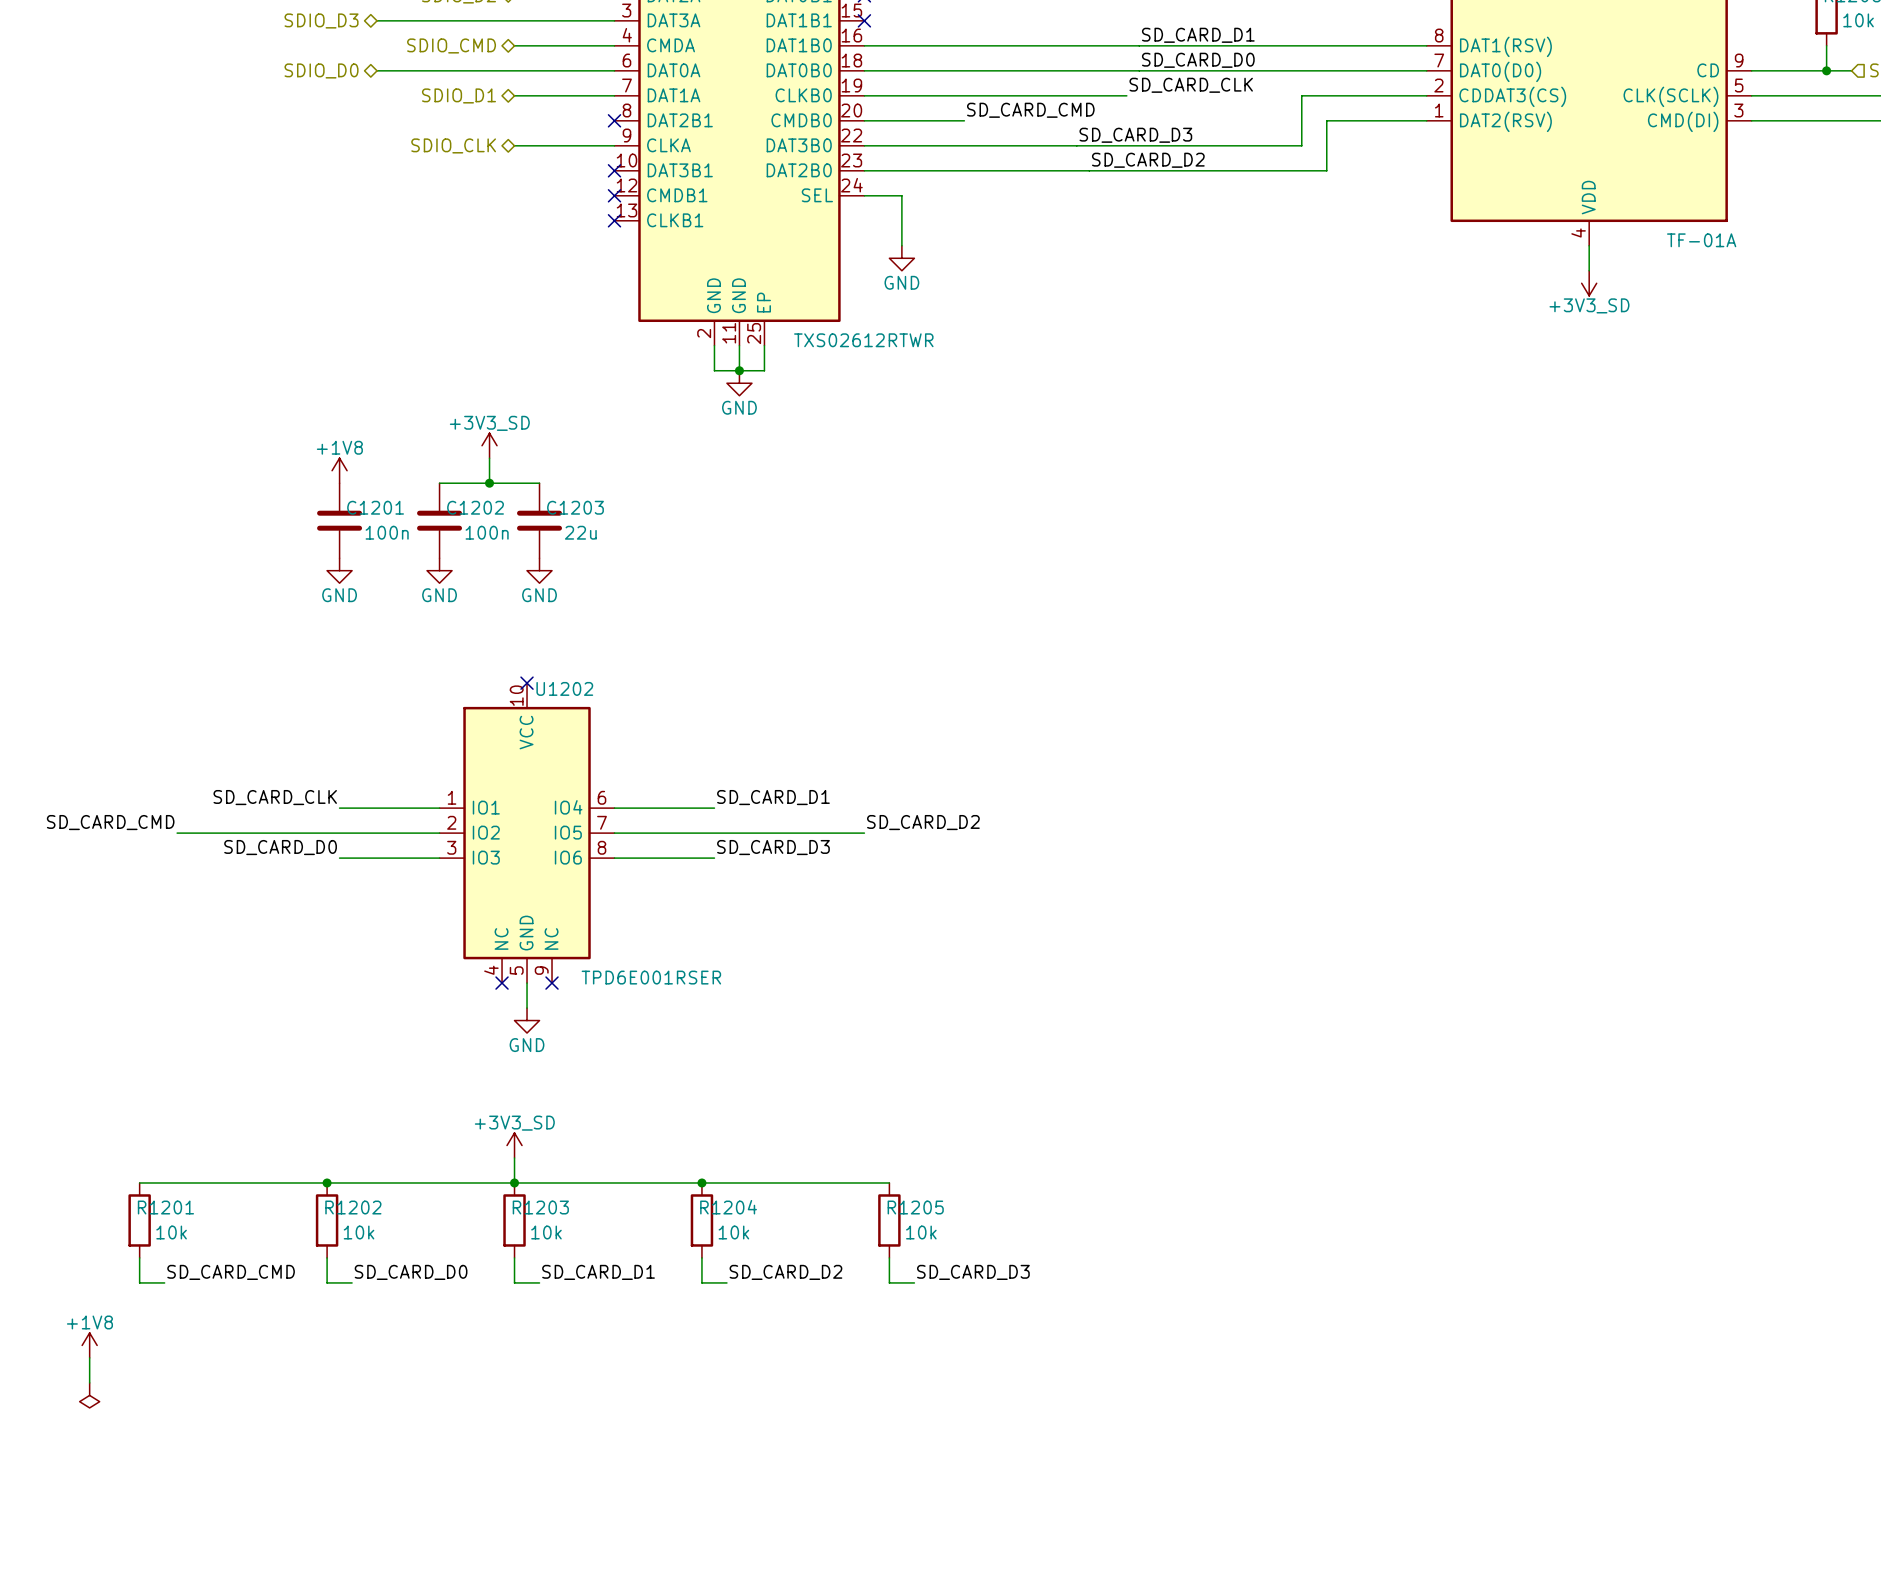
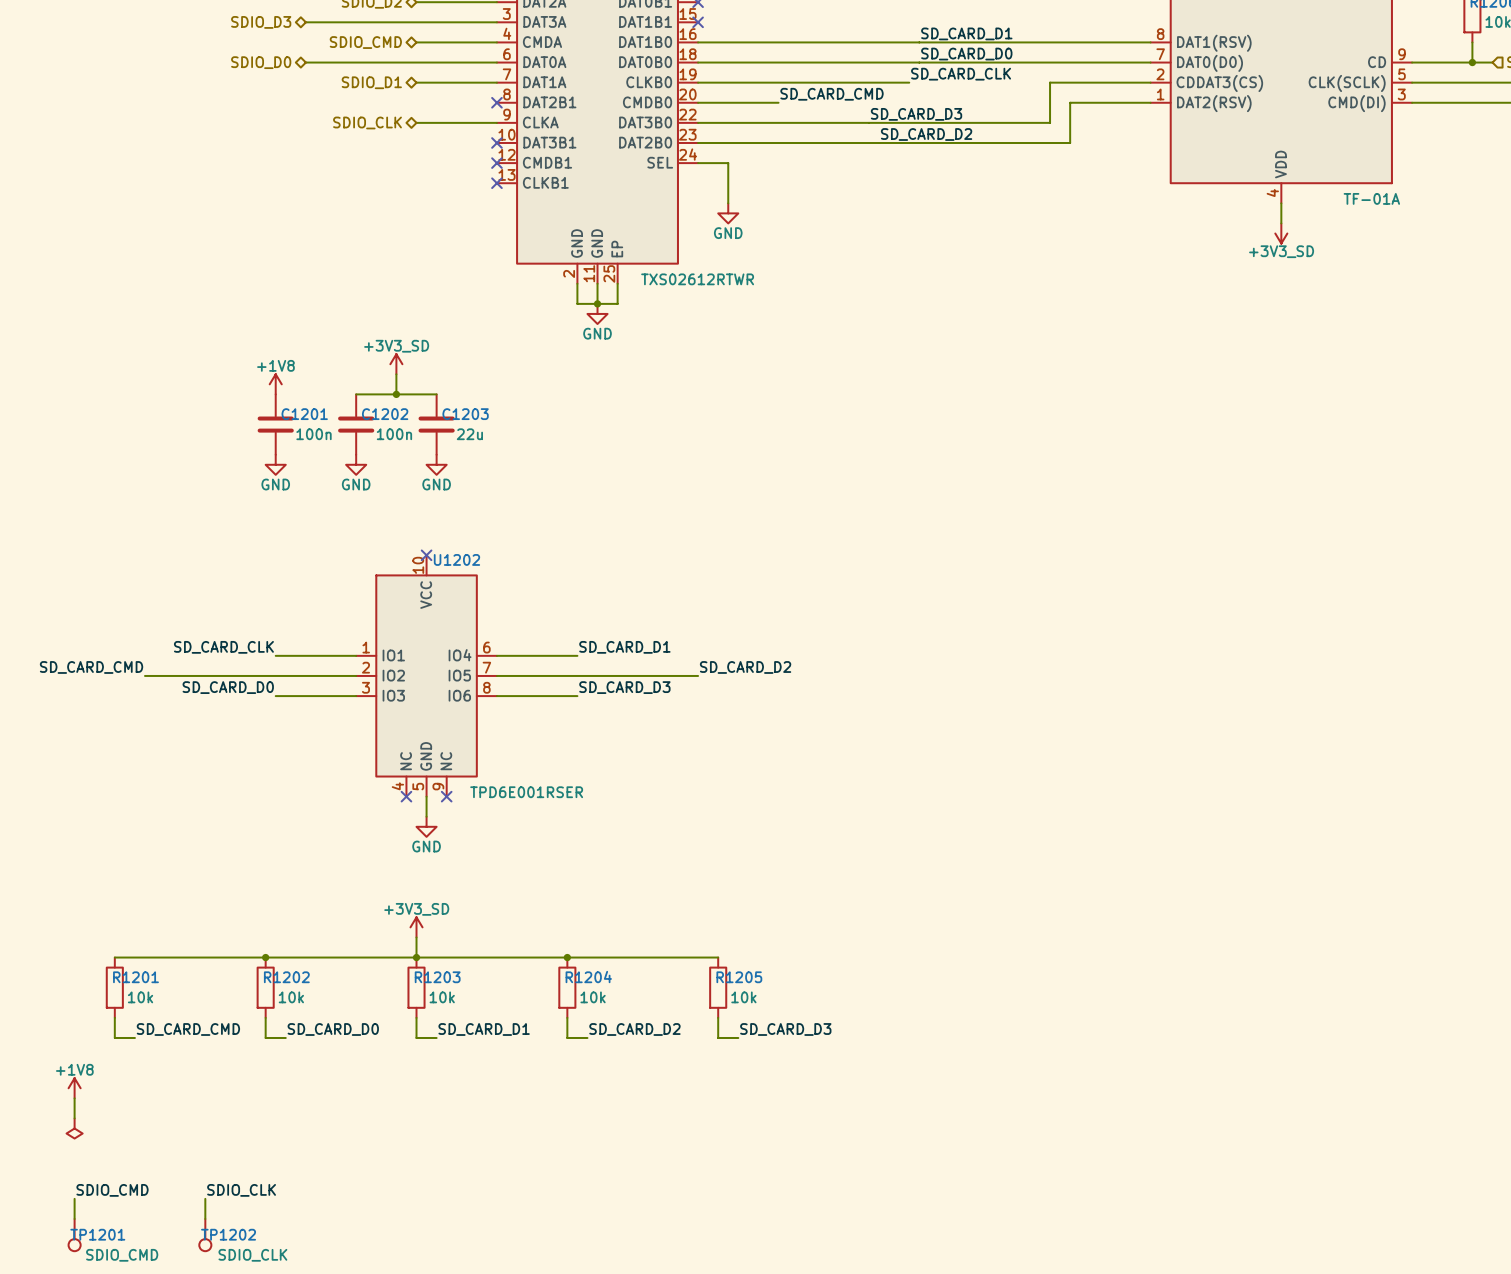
label: none -> SDIO_CMD (112, 1190)
label: none -> SDIO_CLK (241, 1190)
wire: none -> (74, 1198) (74, 1219)
wire: none -> (205, 1198) (205, 1219)
TP1201: none -> SDIO_CMD (74, 1235)
TP1202: none -> SDIO_CLK (205, 1235)

